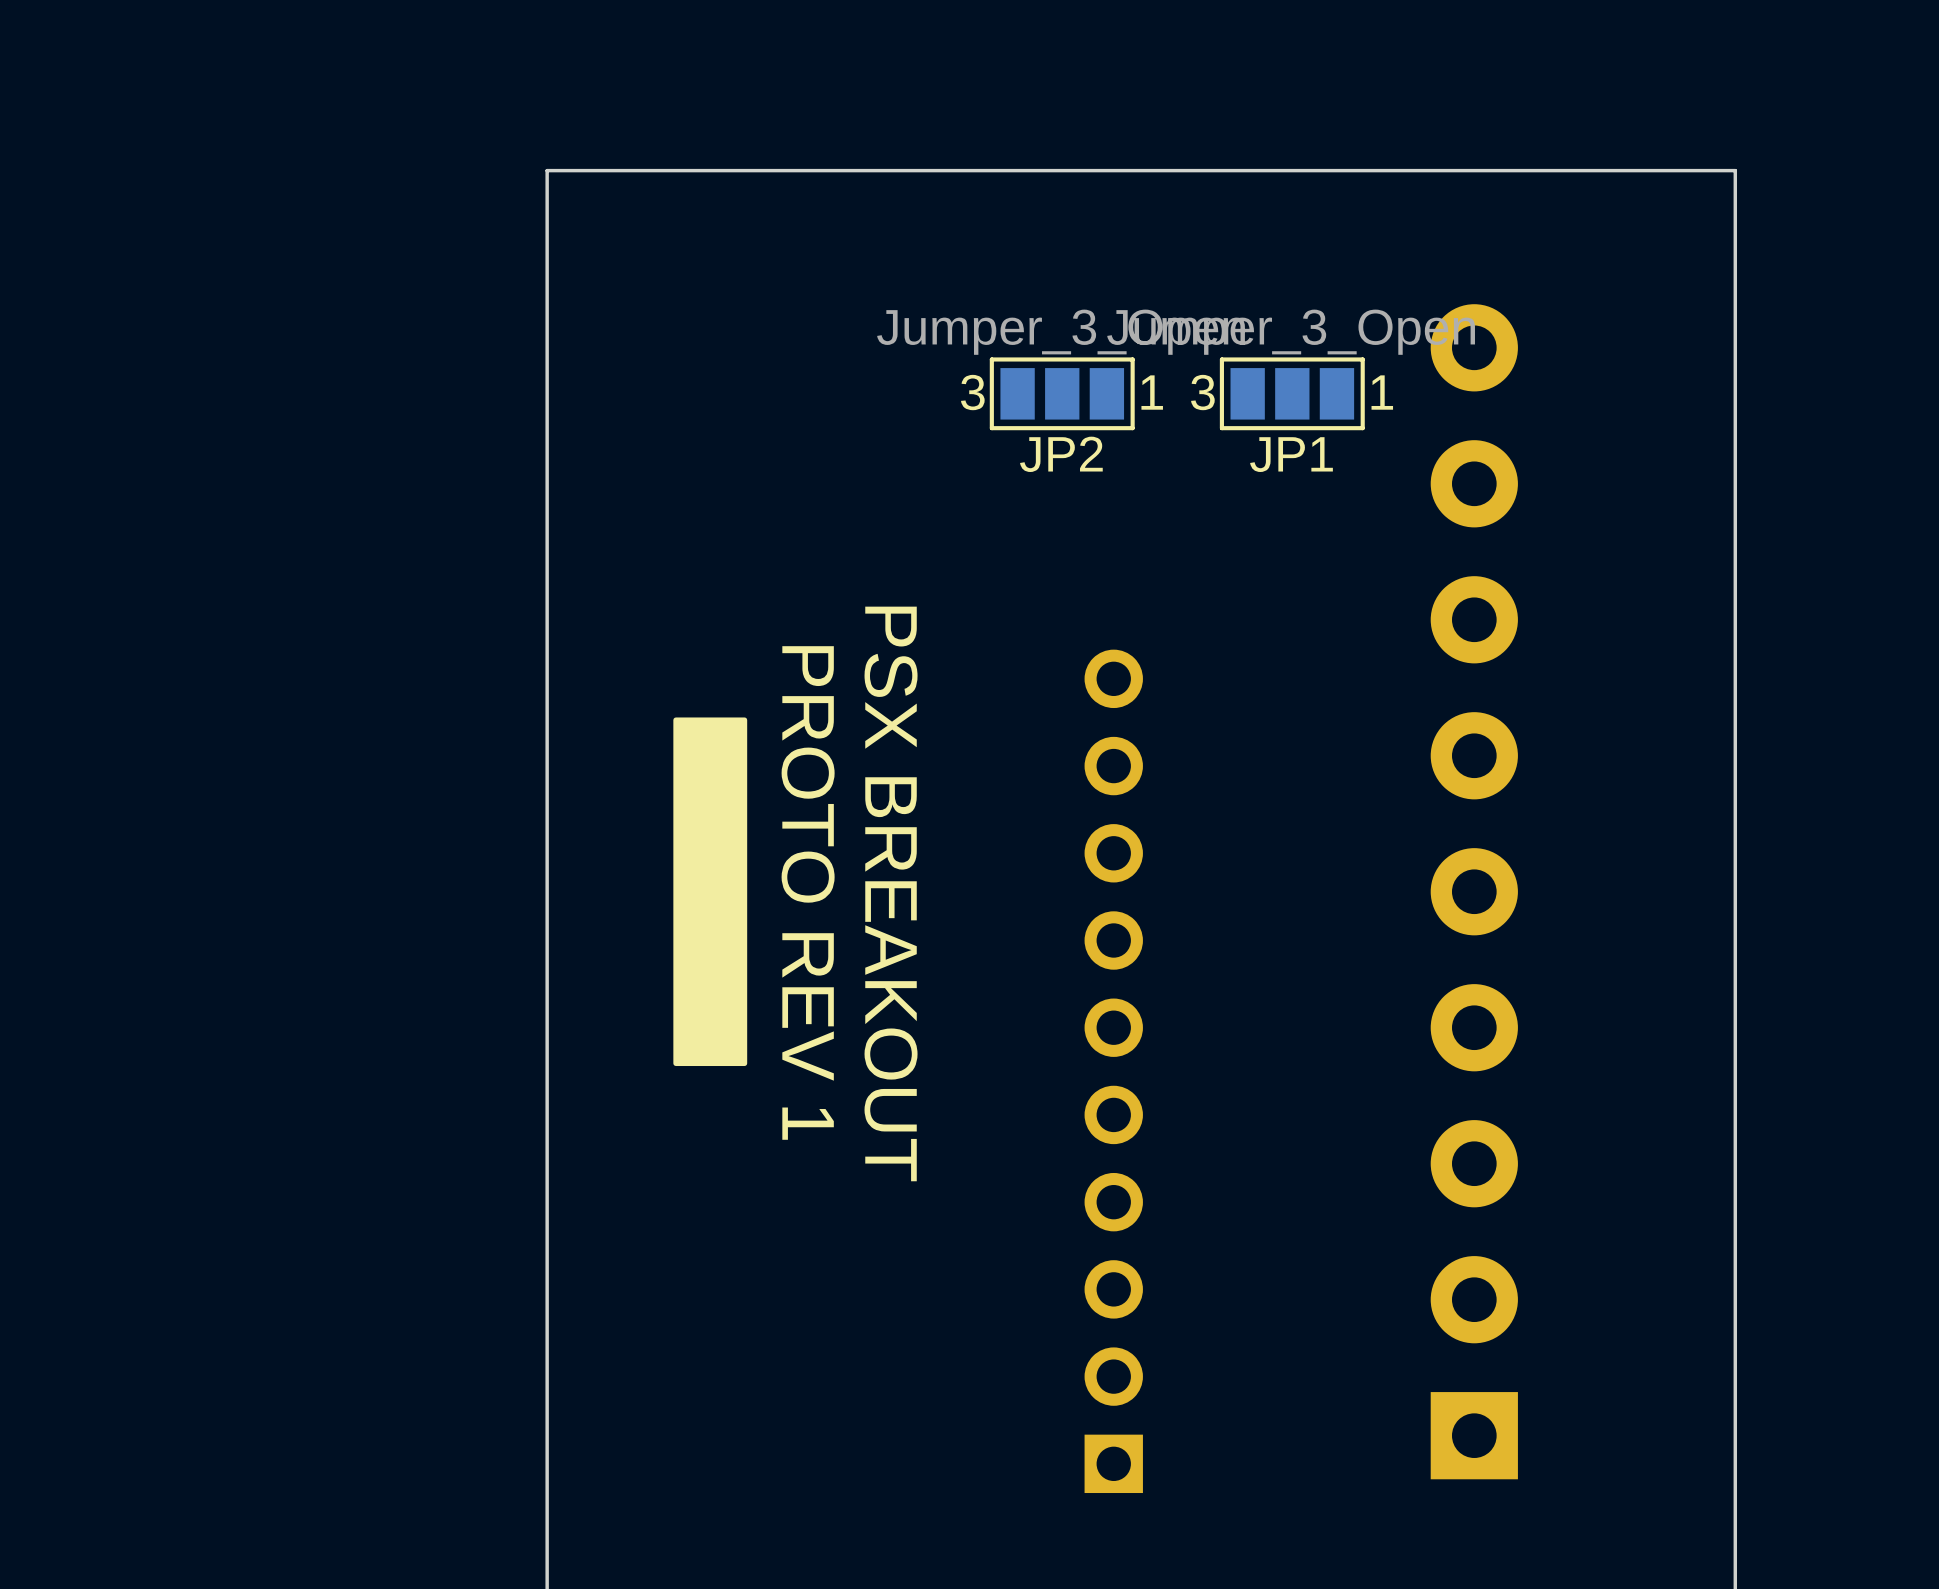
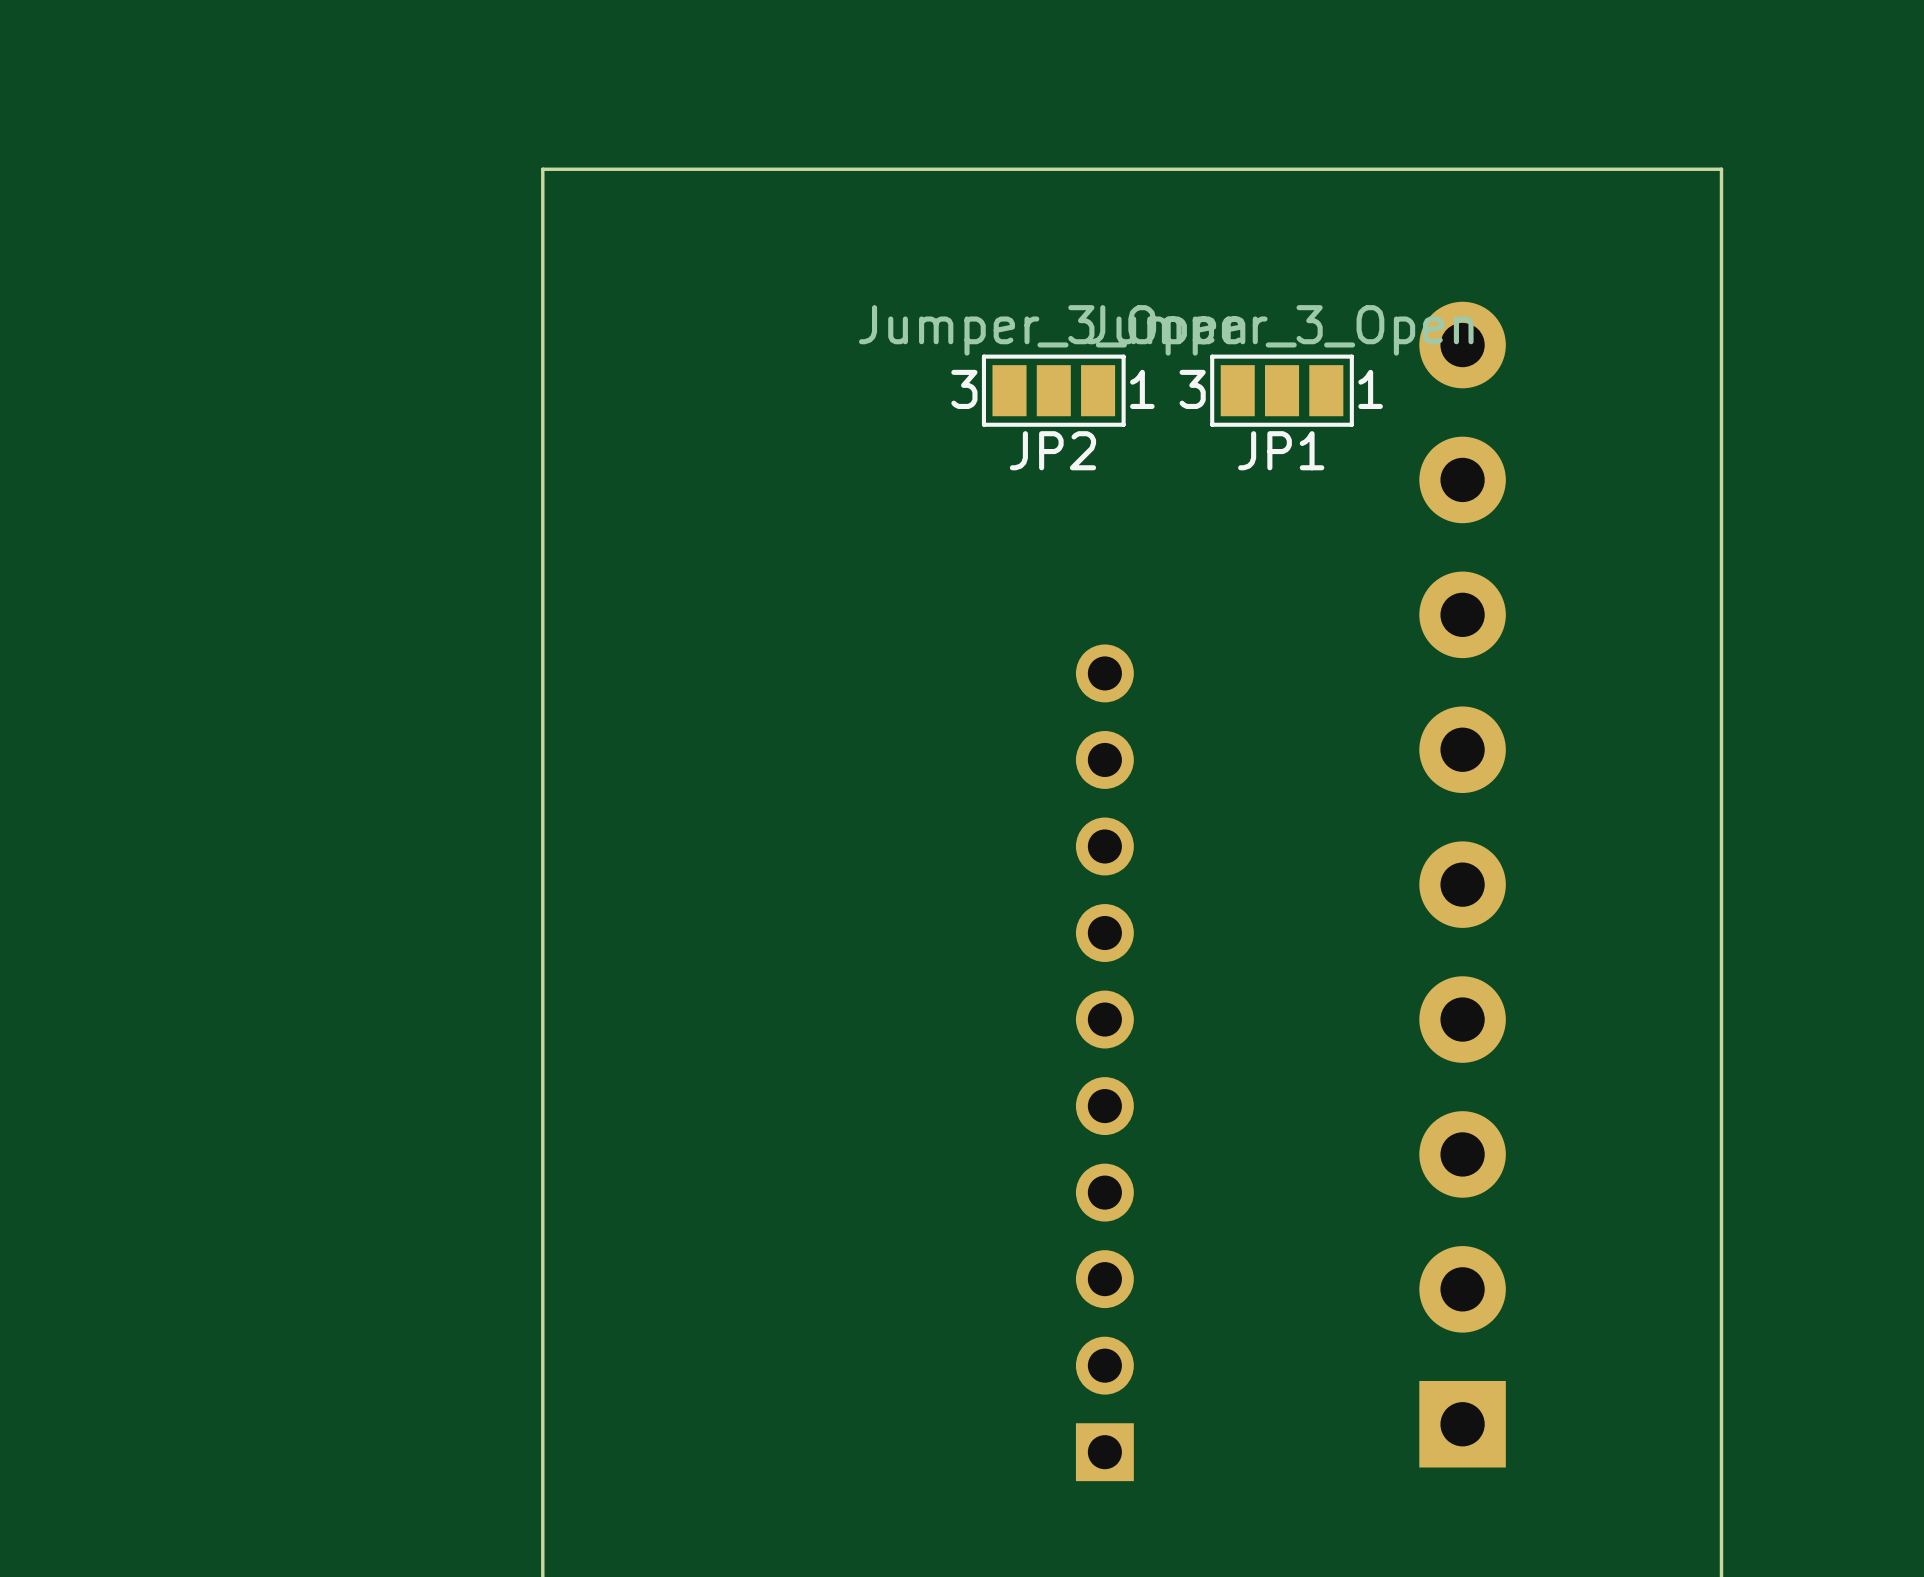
drawing: [673, 717, 748, 1067] -> none
text: PROTO REV 1 (808, 892) -> none
text: PSX BREAKOUT (891, 893) -> none

